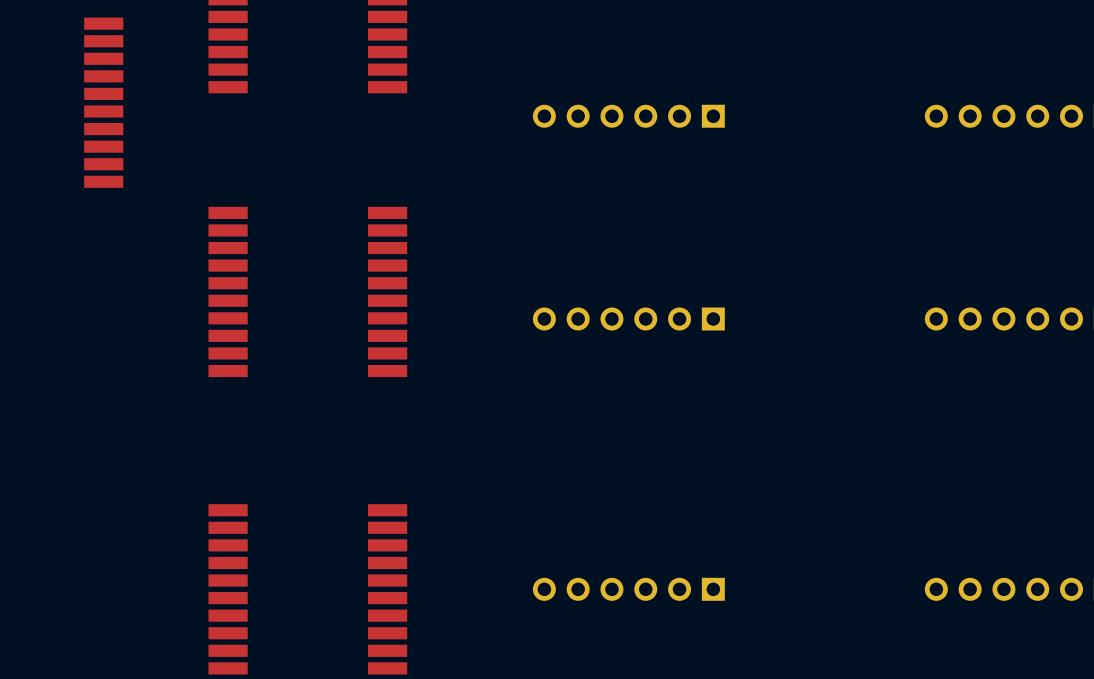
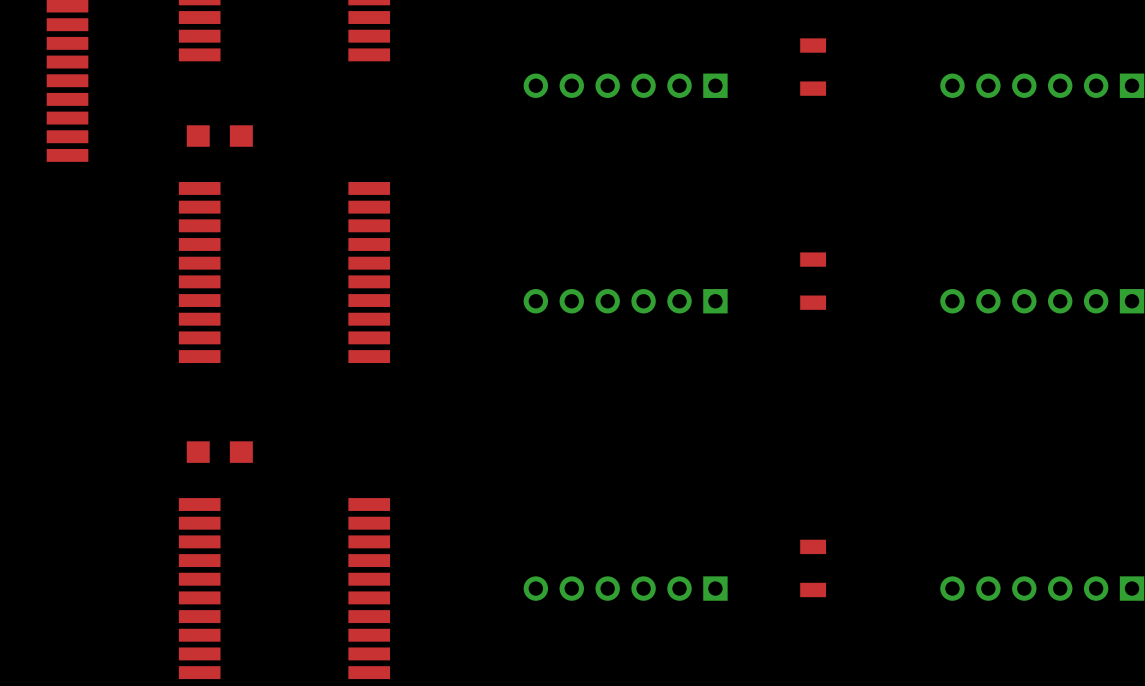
part: none -> (813, 67)
part: none -> (219, 136)
part: none -> (813, 281)
part: none -> (219, 452)
part: none -> (813, 568)

